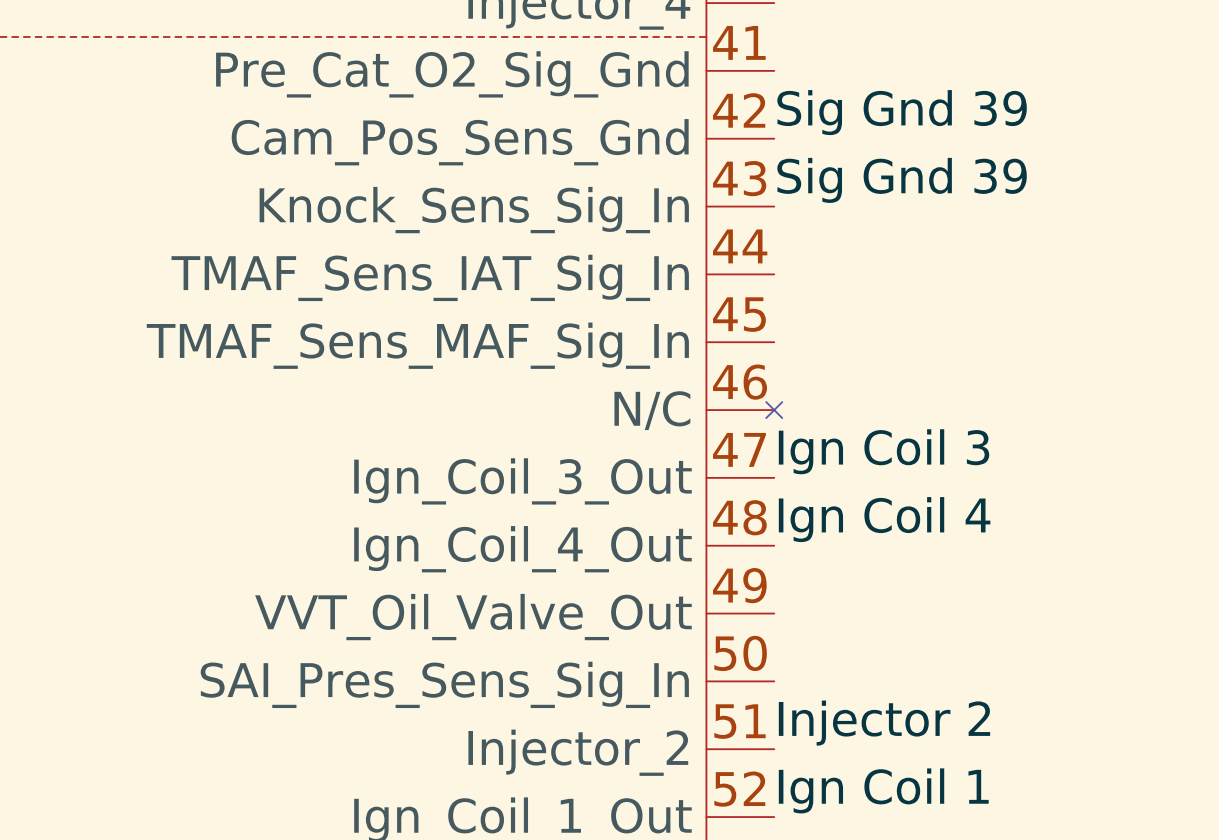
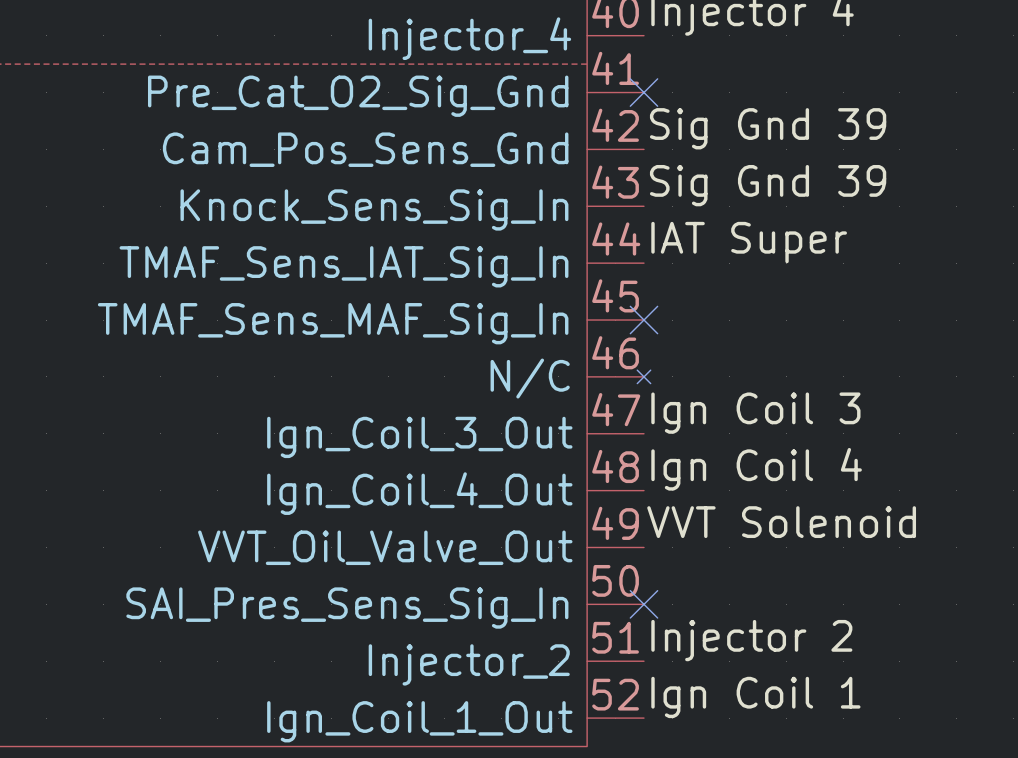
no-connect mark: none -> (643, 92)
label: none -> IAT Super (749, 242)
no-connect mark: none -> (643, 320)
label: none -> VVT Solenoid (781, 522)
no-connect mark: none -> (643, 604)

